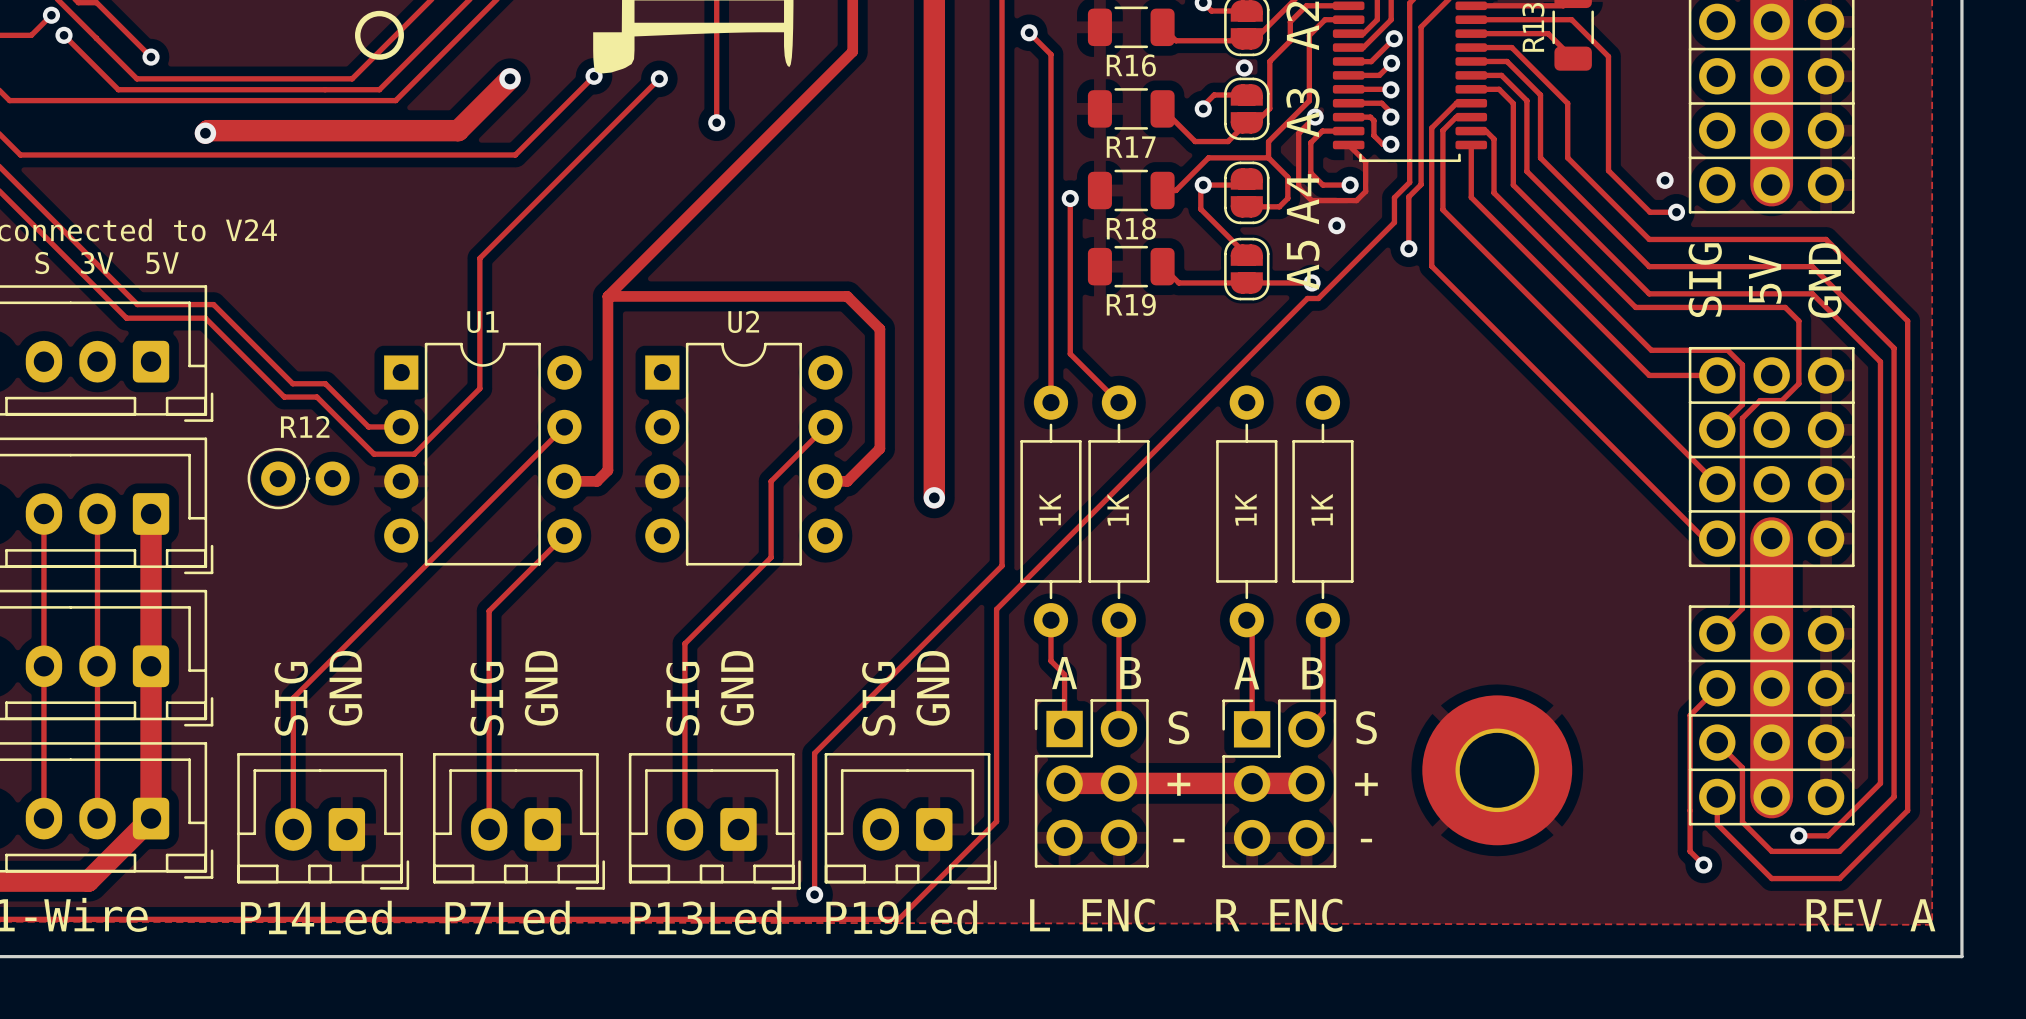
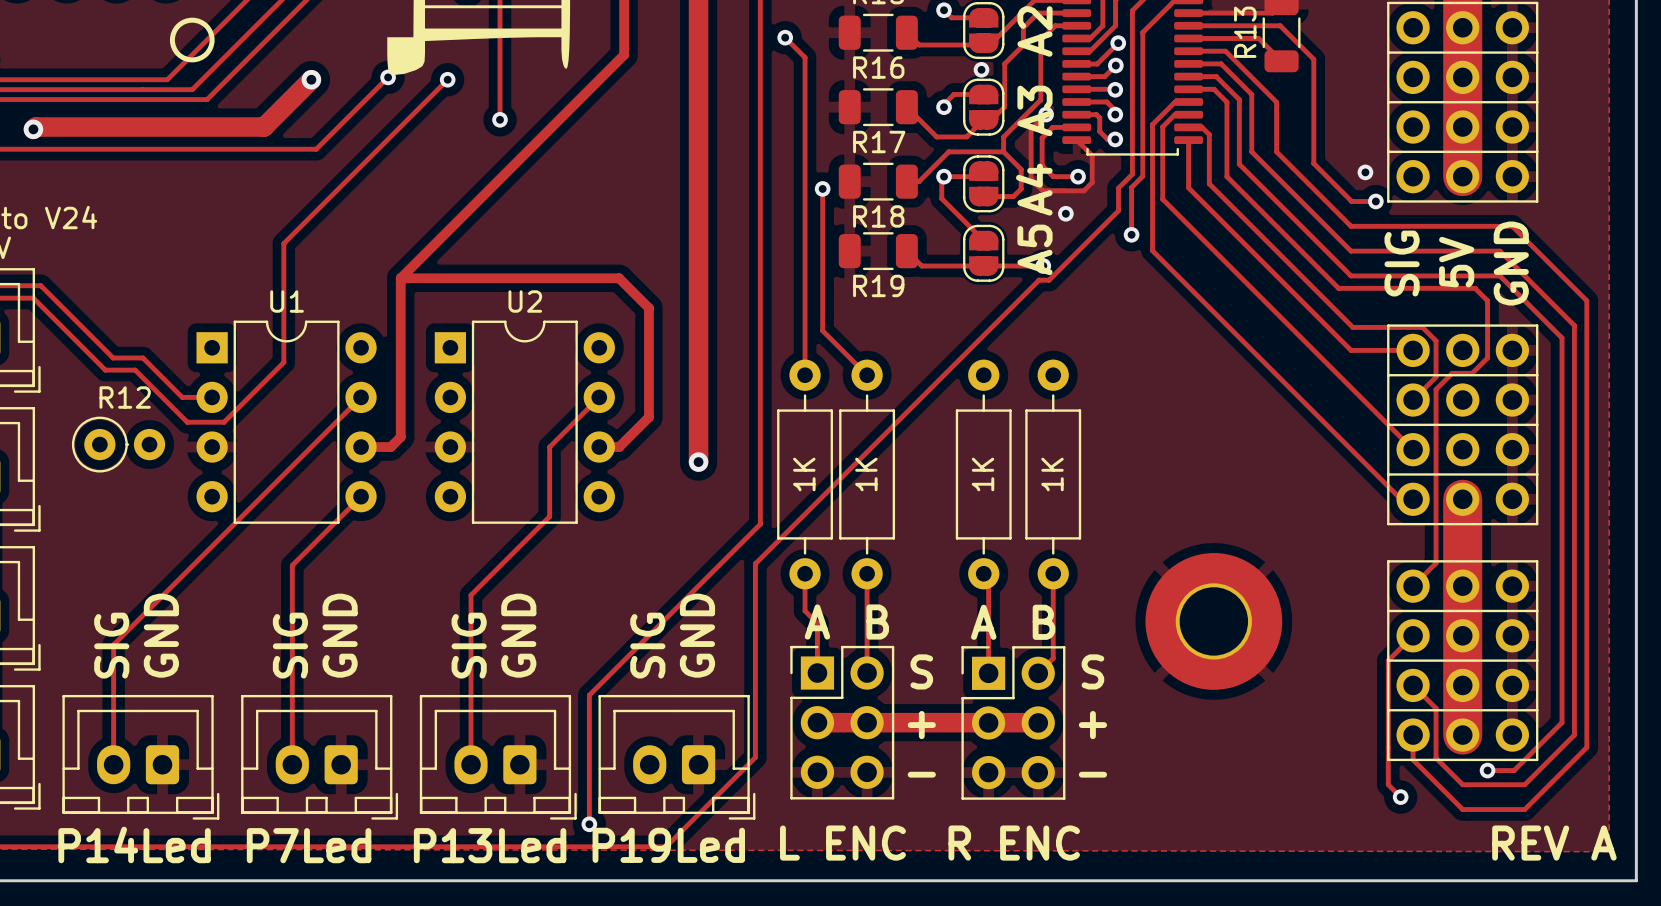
part position: (1497, 770) -> (1213, 621)

